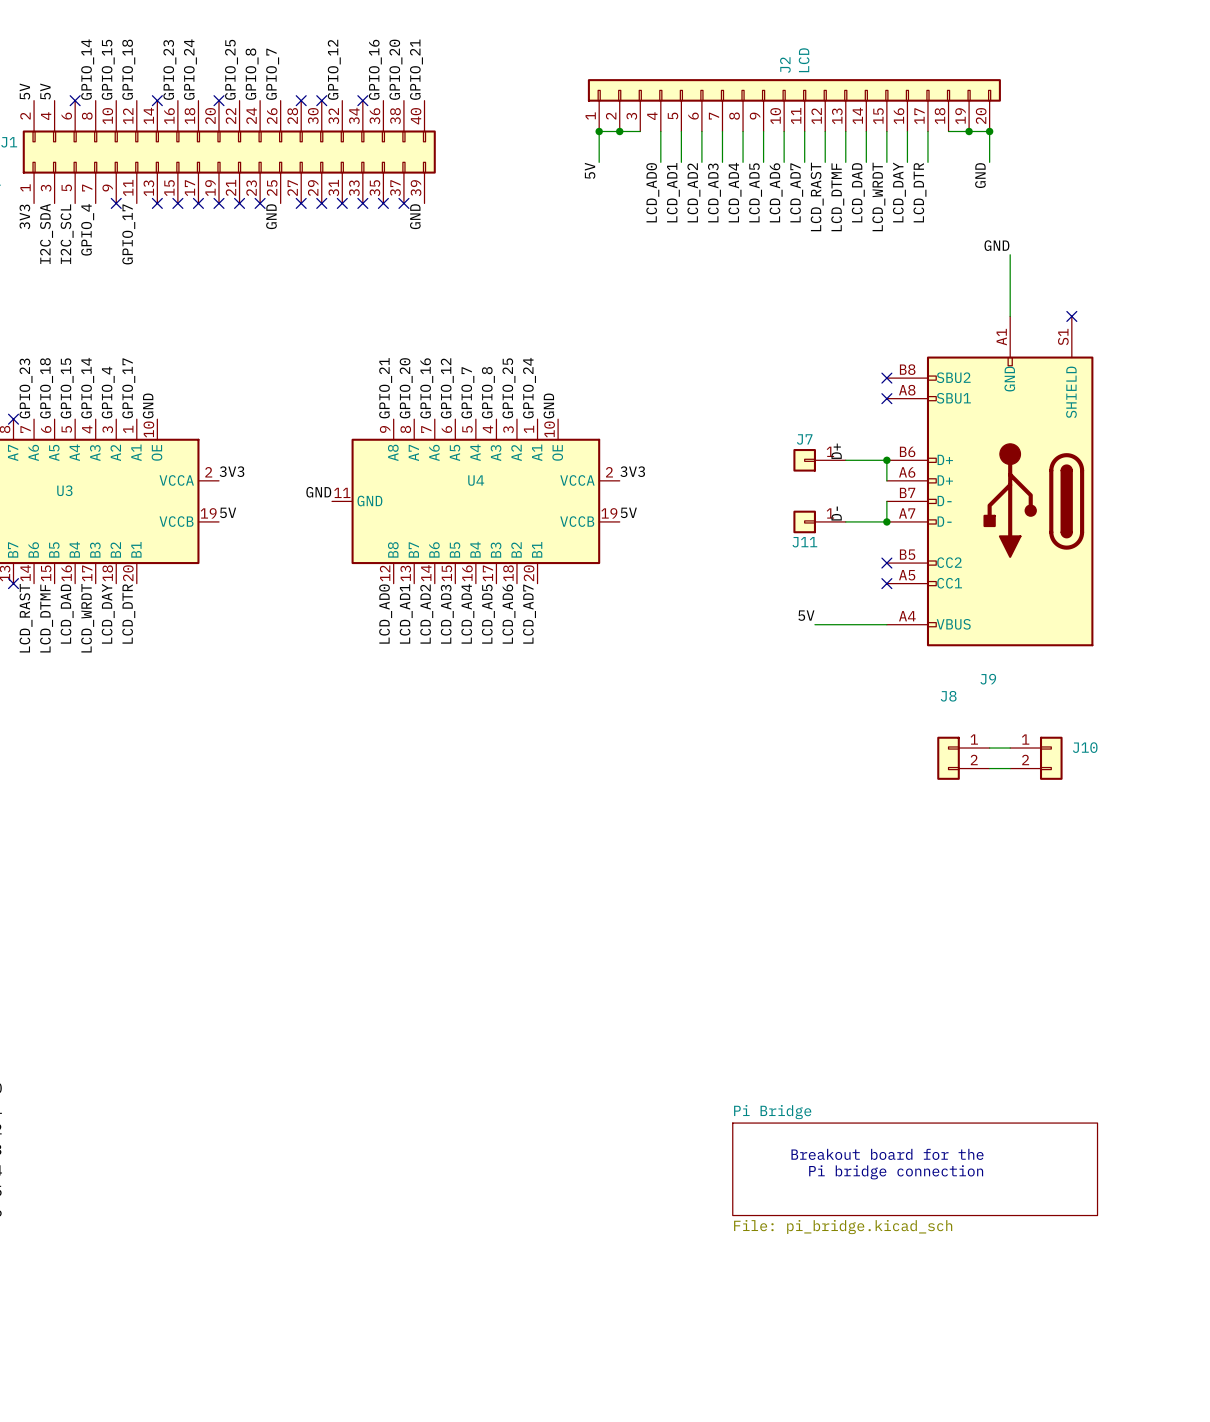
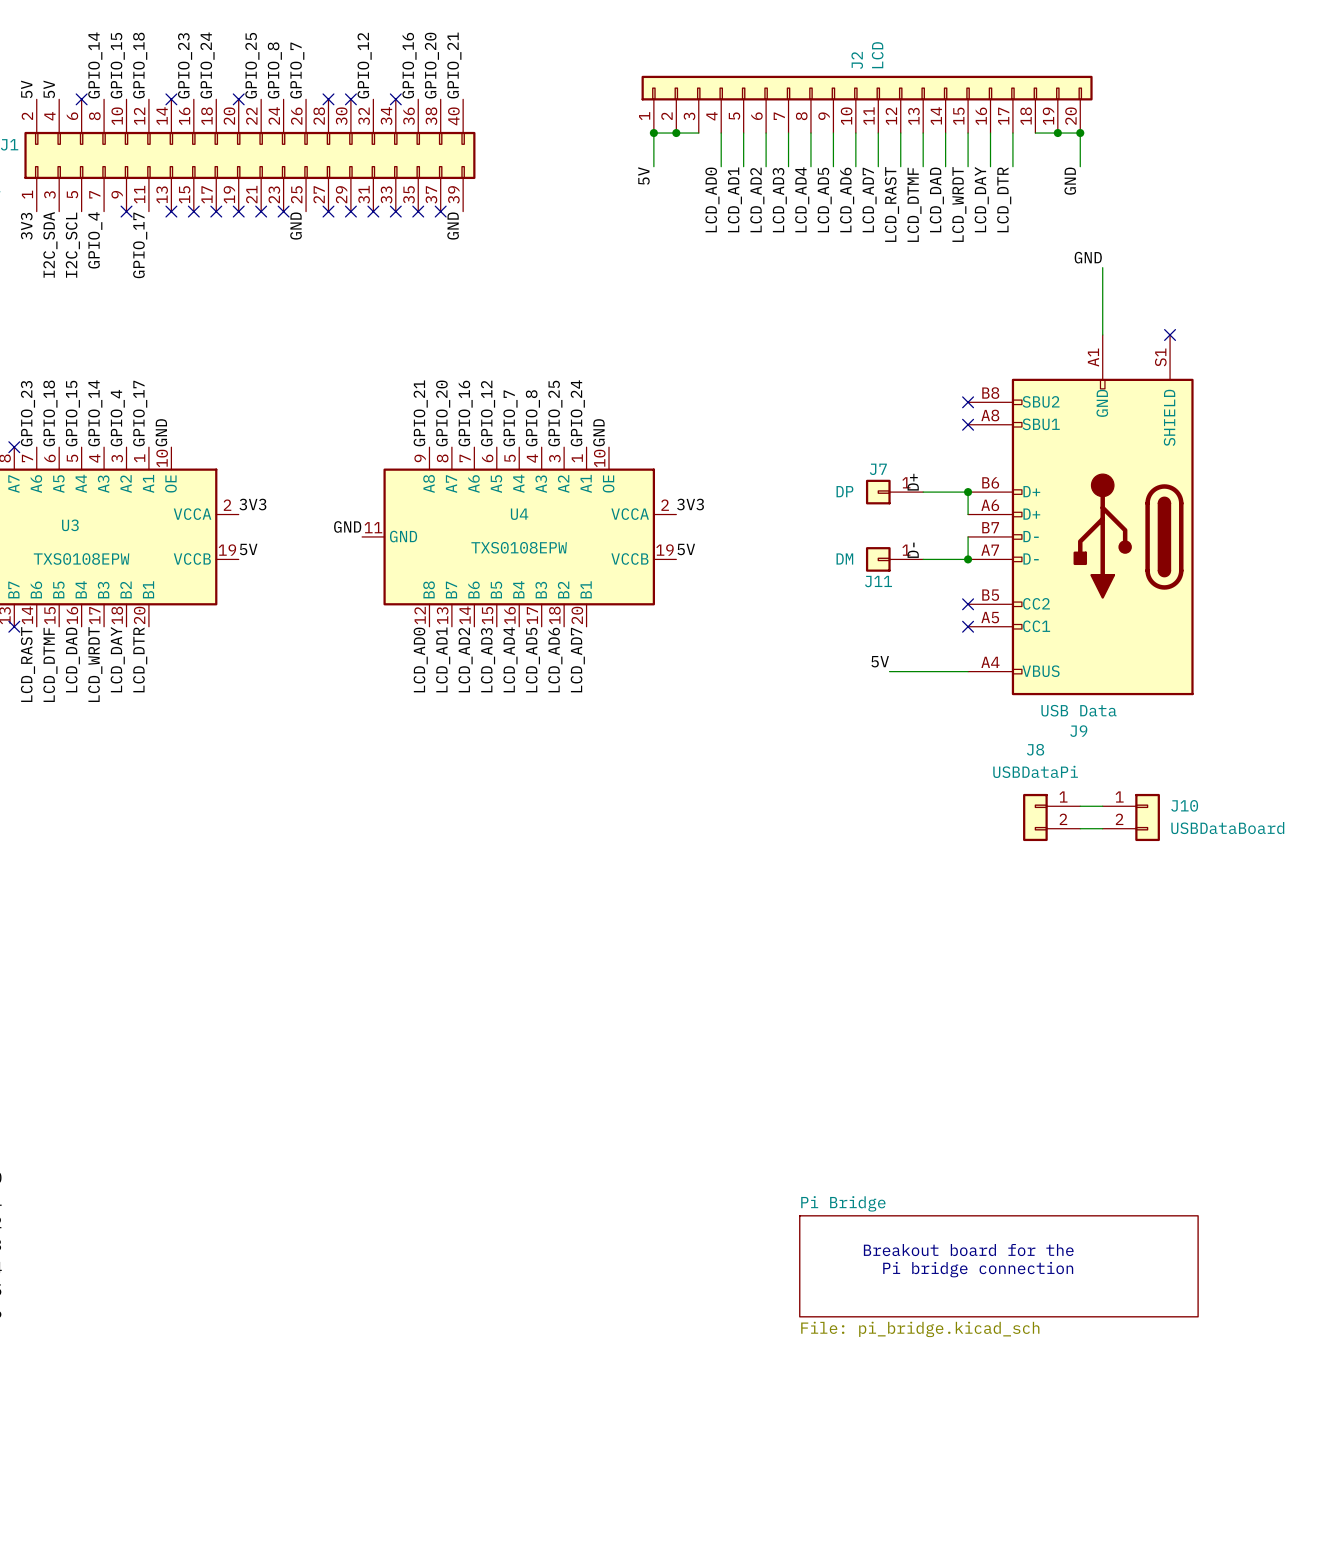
J7 value: none -> DP (844, 491)
U4 value: none -> TXS0108EPW (519, 547)
U3 value: none -> TXS0108EPW (81, 558)
J11 value: none -> DM (844, 558)
J9 value: none -> USB Data (1078, 710)
J8 value: none -> USBDataPi (1035, 771)
J10 value: none -> USBDataBoard (1227, 828)

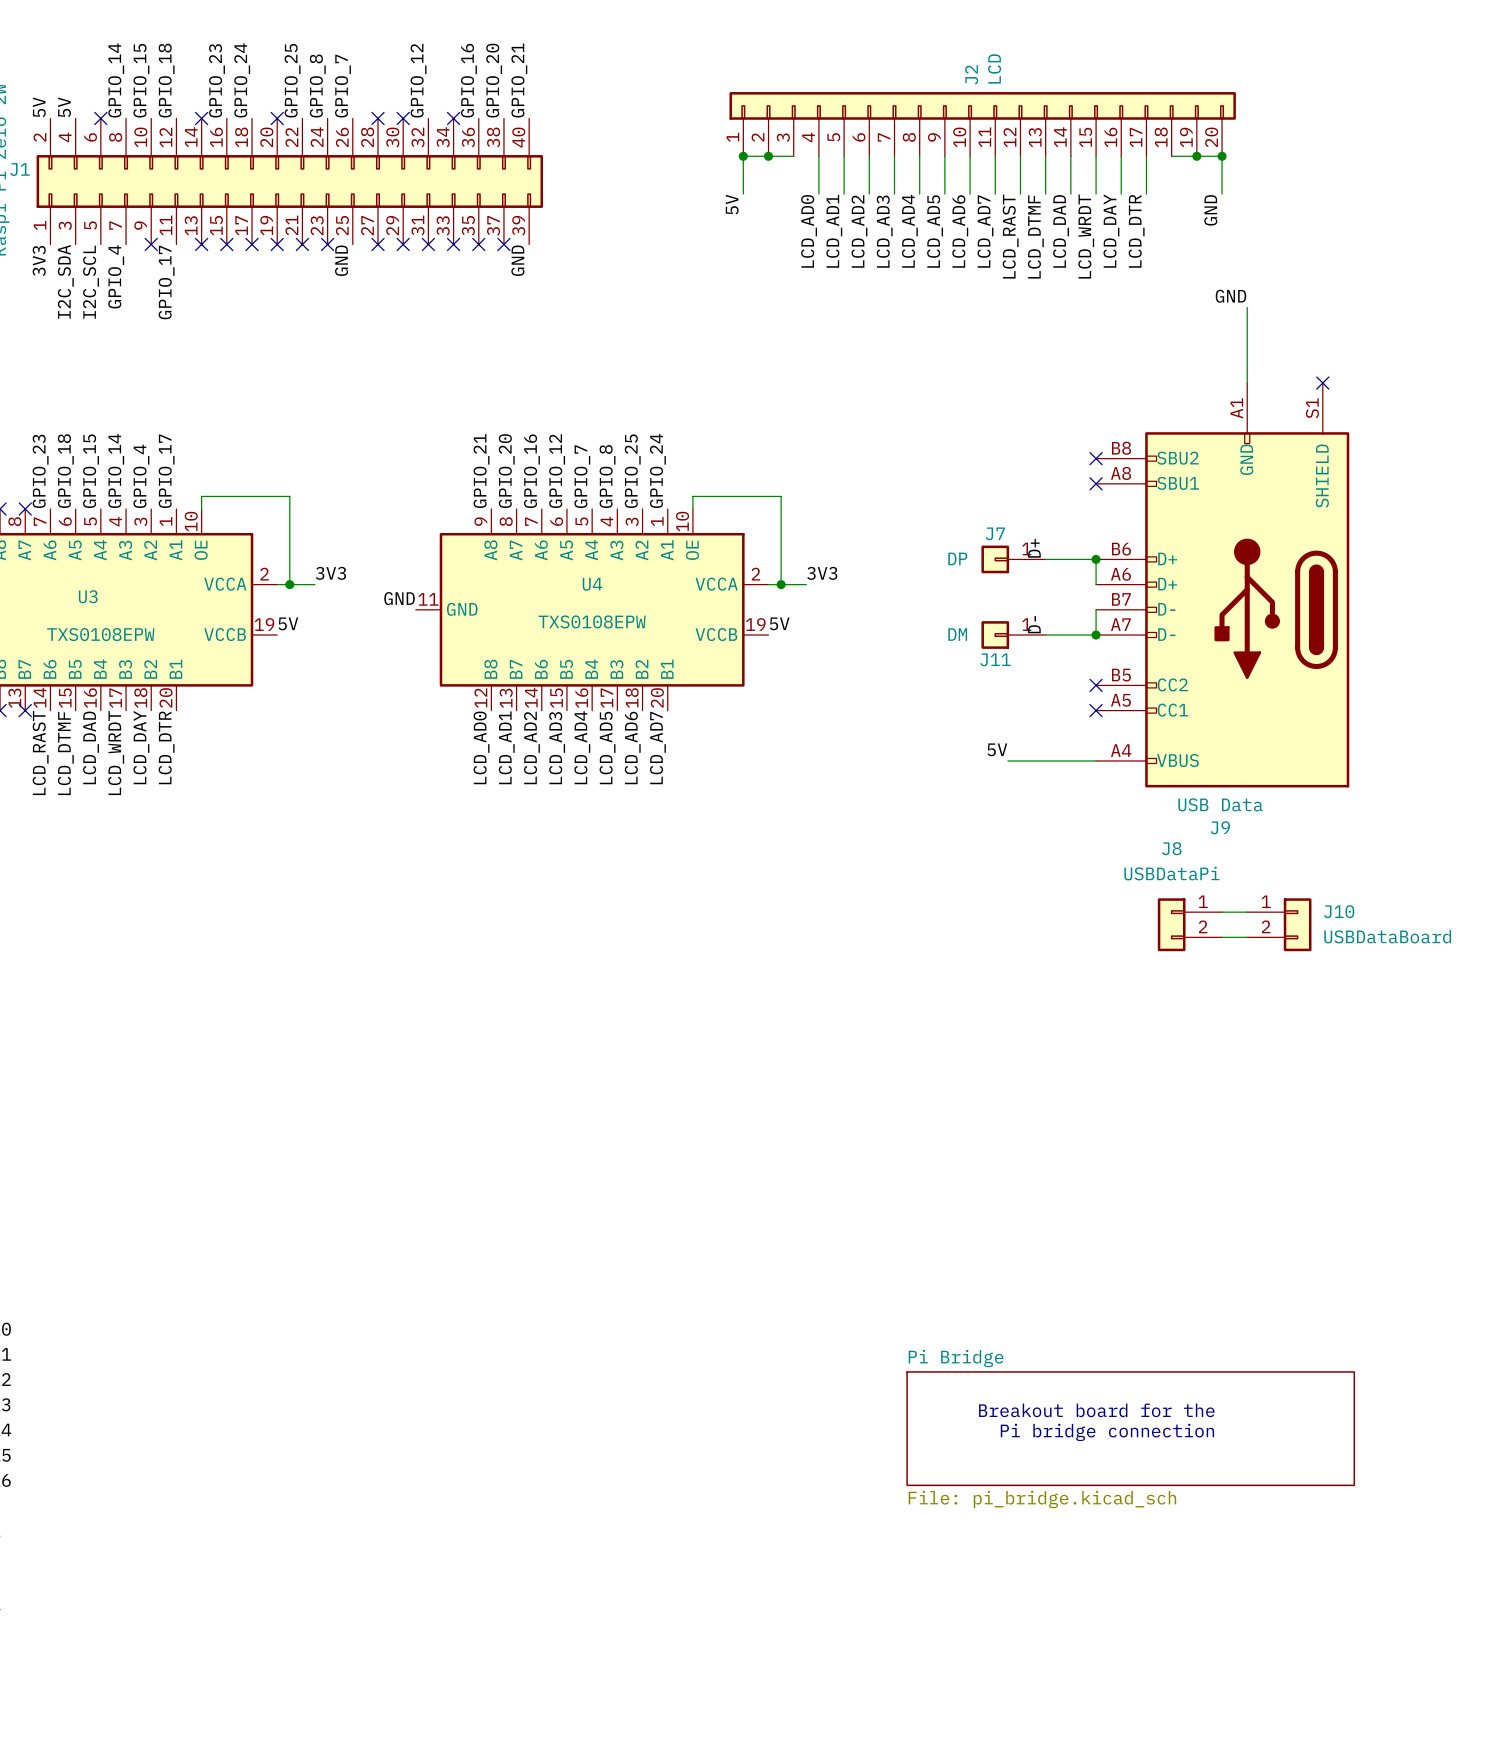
label: GND (161, 432) -> none
label: GND (598, 432) -> none
wire: none -> (201, 509) (201, 496) (289, 496) (289, 584)
wire: none -> (692, 509) (692, 496) (781, 496) (781, 584)
label position: 3V3 (252, 504) -> 3V3 (330, 573)
label position: 3V3 (690, 504) -> 3V3 (822, 573)
wire: none -> (277, 584) (315, 584)
junction: none -> (289, 584)
wire: none -> (768, 584) (806, 584)
junction: none -> (781, 584)

